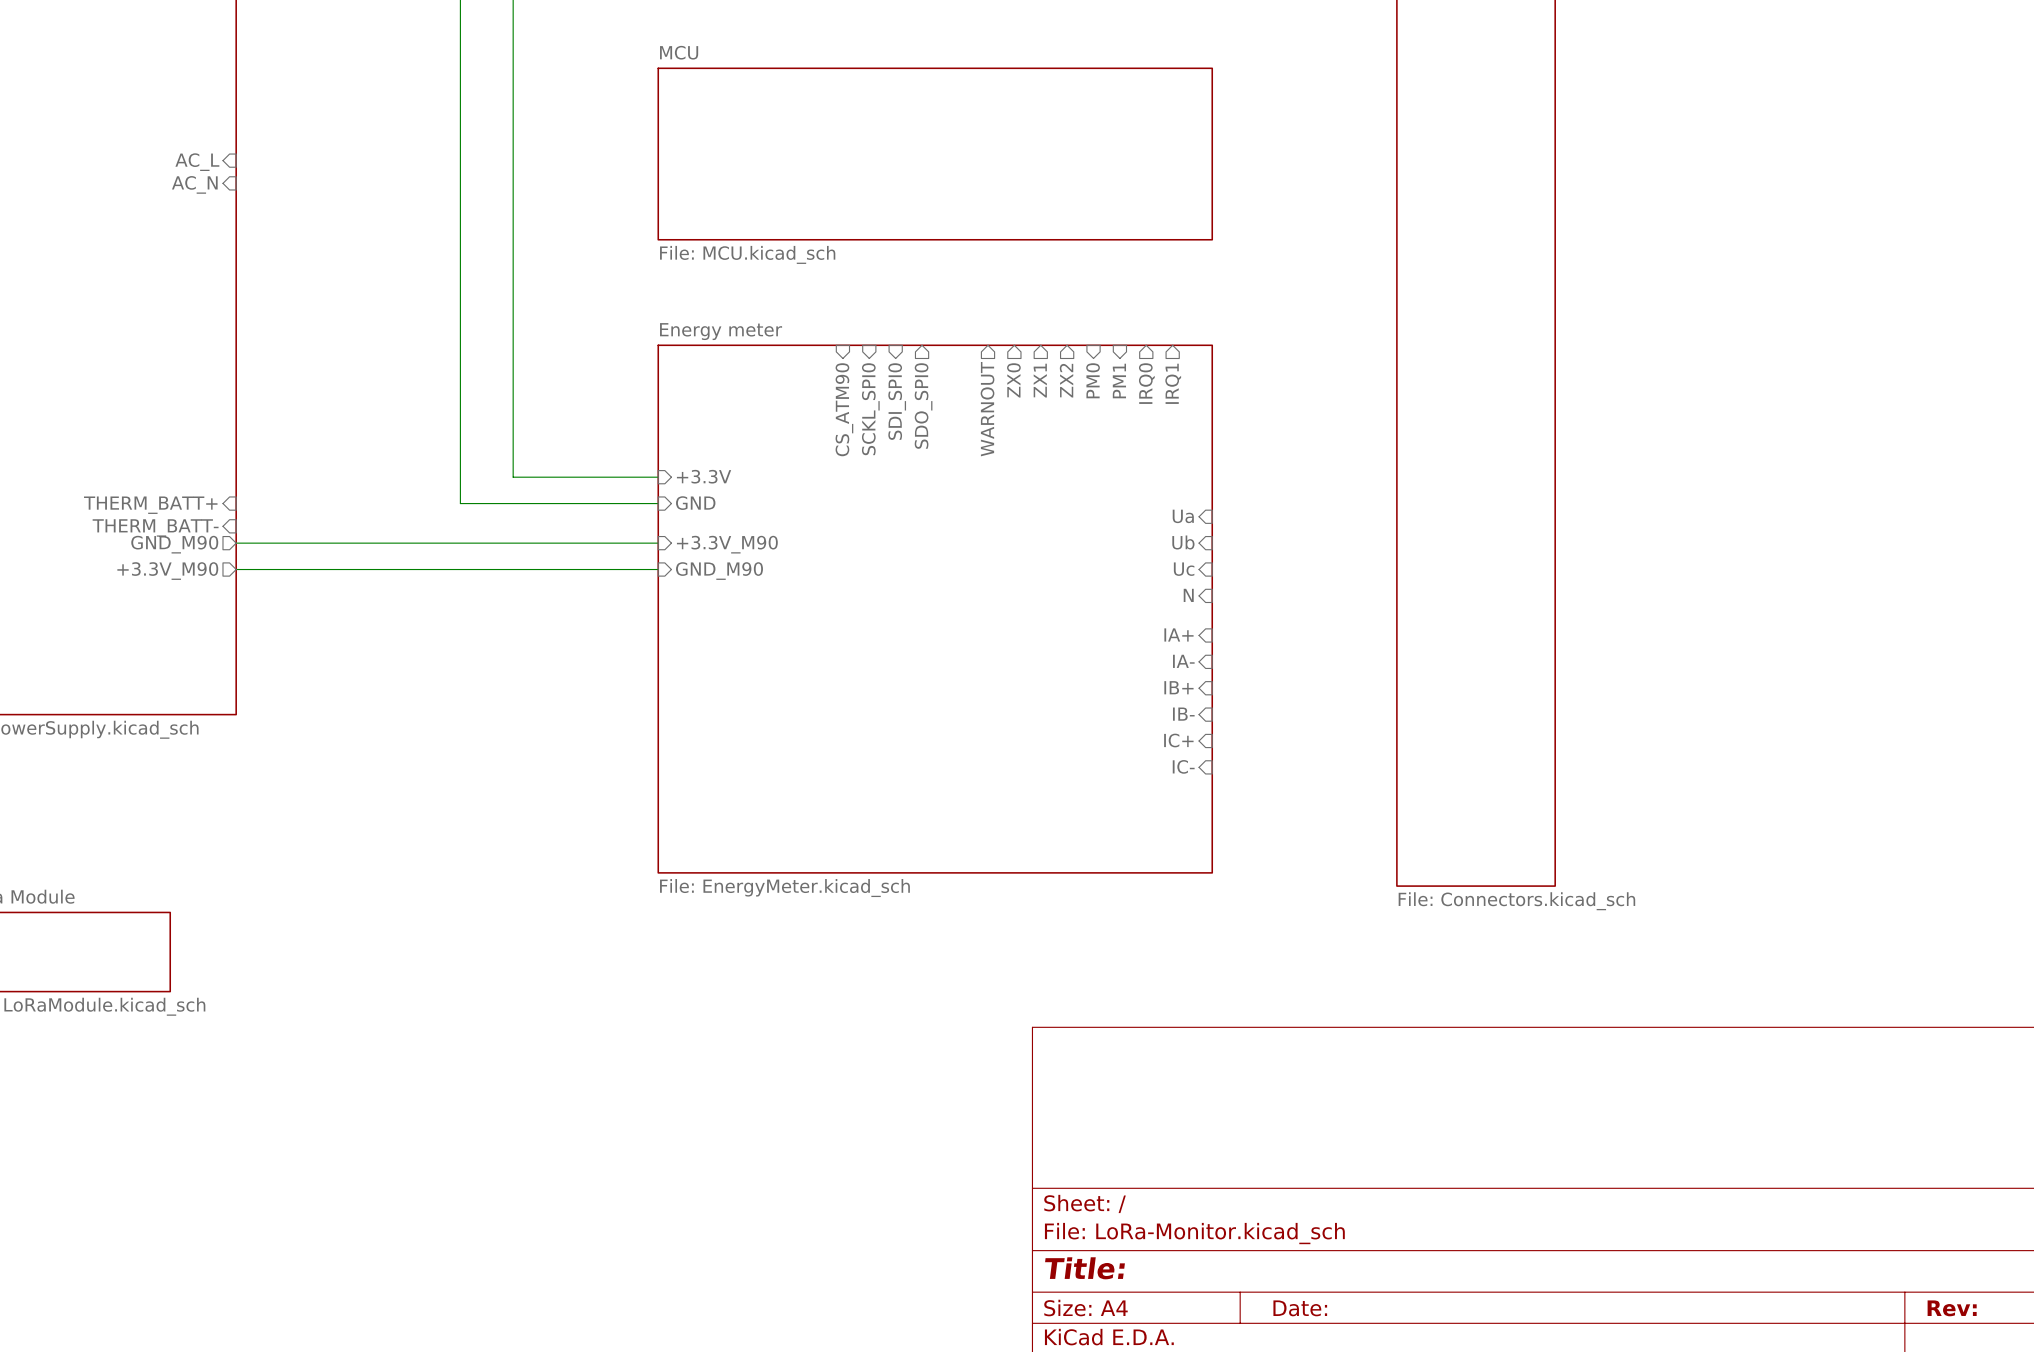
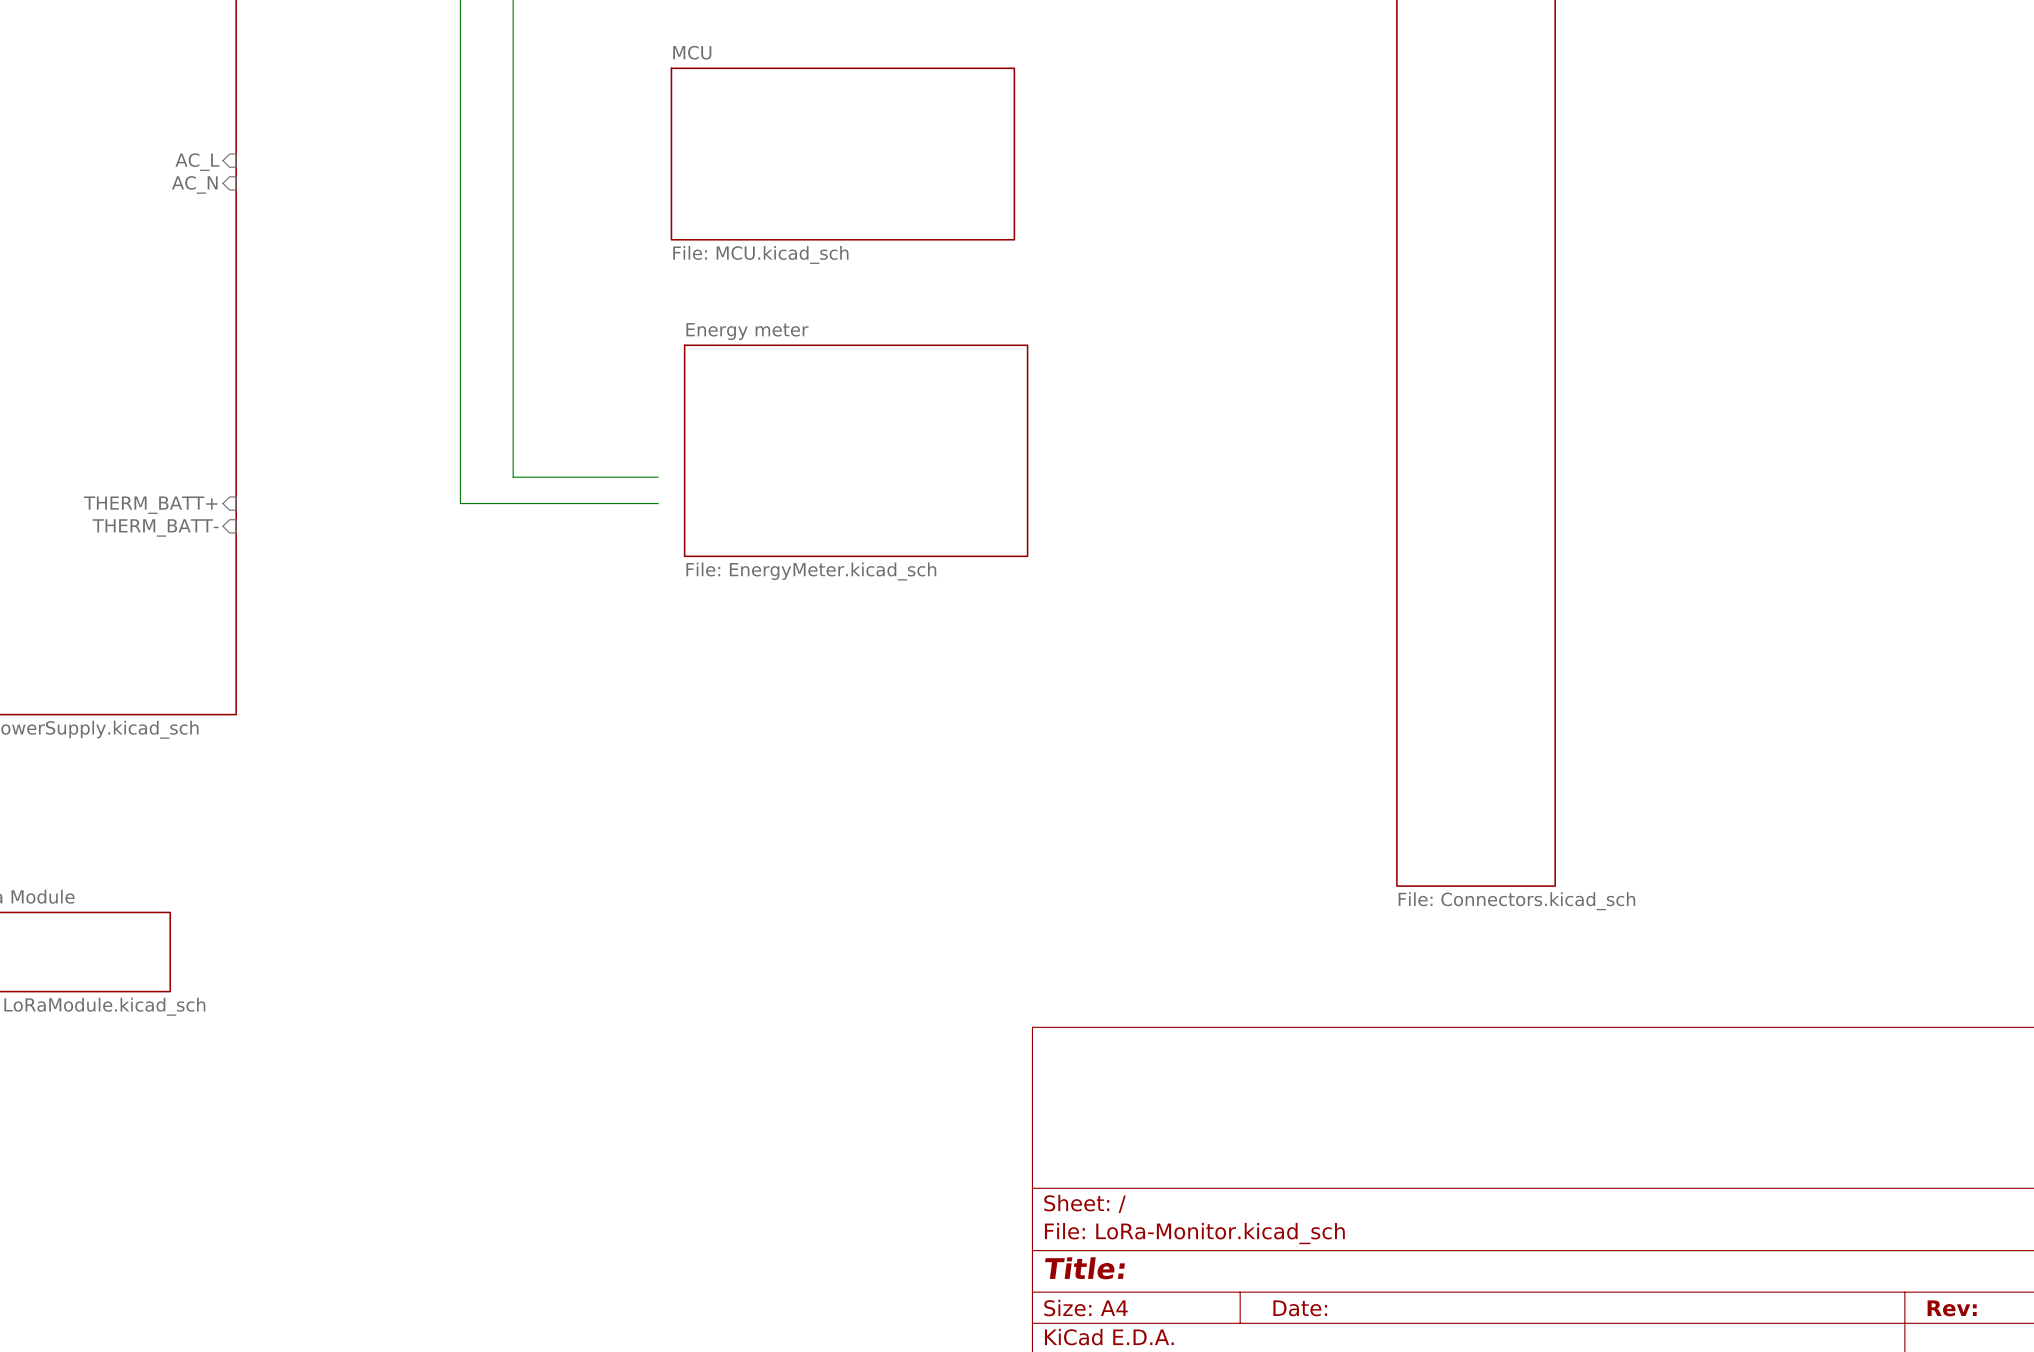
sheet MCU: none -> File: MCU.kicad_sch (842, 154)
sheet MCU: File: MCU.kicad_sch (935, 154) -> none
sheet pin: ZX0 (1013, 380) -> none
sheet pin: ZX1 (1040, 380) -> none
sheet pin: ZX2 (1066, 380) -> none
sheet pin: PM0 (1093, 380) -> none
sheet pin: PM1 (1119, 381) -> none
sheet pin: IRQ0 (1146, 383) -> none
sheet pin: IRQ1 (1173, 383) -> none
sheet pin: SDI_SPI0 (897, 401) -> none
sheet pin: SDO_SPI0 (923, 406) -> none
sheet pin: CS_ATM90 (844, 409) -> none
sheet pin: SCKL_SPI0 (870, 409) -> none
sheet pin: WARNOUT (987, 409) -> none
sheet Energy meter: none -> File: EnergyMeter.kicad_sch (856, 450)
sheet pin: +3.3V (704, 476) -> none
sheet pin: GND (695, 503) -> none
sheet pin: Ua (1183, 516) -> none
sheet pin: Ub (1183, 542) -> none
wire: (236, 543) (658, 543) -> none
sheet pin: GND_M90 (174, 544) -> none
sheet pin: +3.3V_M90 (727, 544) -> none
wire: (236, 569) (658, 569) -> none
sheet pin: Uc (1184, 569) -> none
sheet pin: +3.3V_M90 (167, 571) -> none
sheet pin: GND_M90 (719, 571) -> none
sheet pin: N (1188, 595) -> none
sheet Energy meter: File: EnergyMeter.kicad_sch (935, 609) -> none
sheet pin: IA+ (1178, 634) -> none
sheet pin: IA- (1183, 661) -> none
sheet pin: IB+ (1178, 687) -> none
sheet pin: IB- (1183, 714) -> none
sheet pin: IC+ (1178, 740) -> none
sheet pin: IC- (1183, 766) -> none

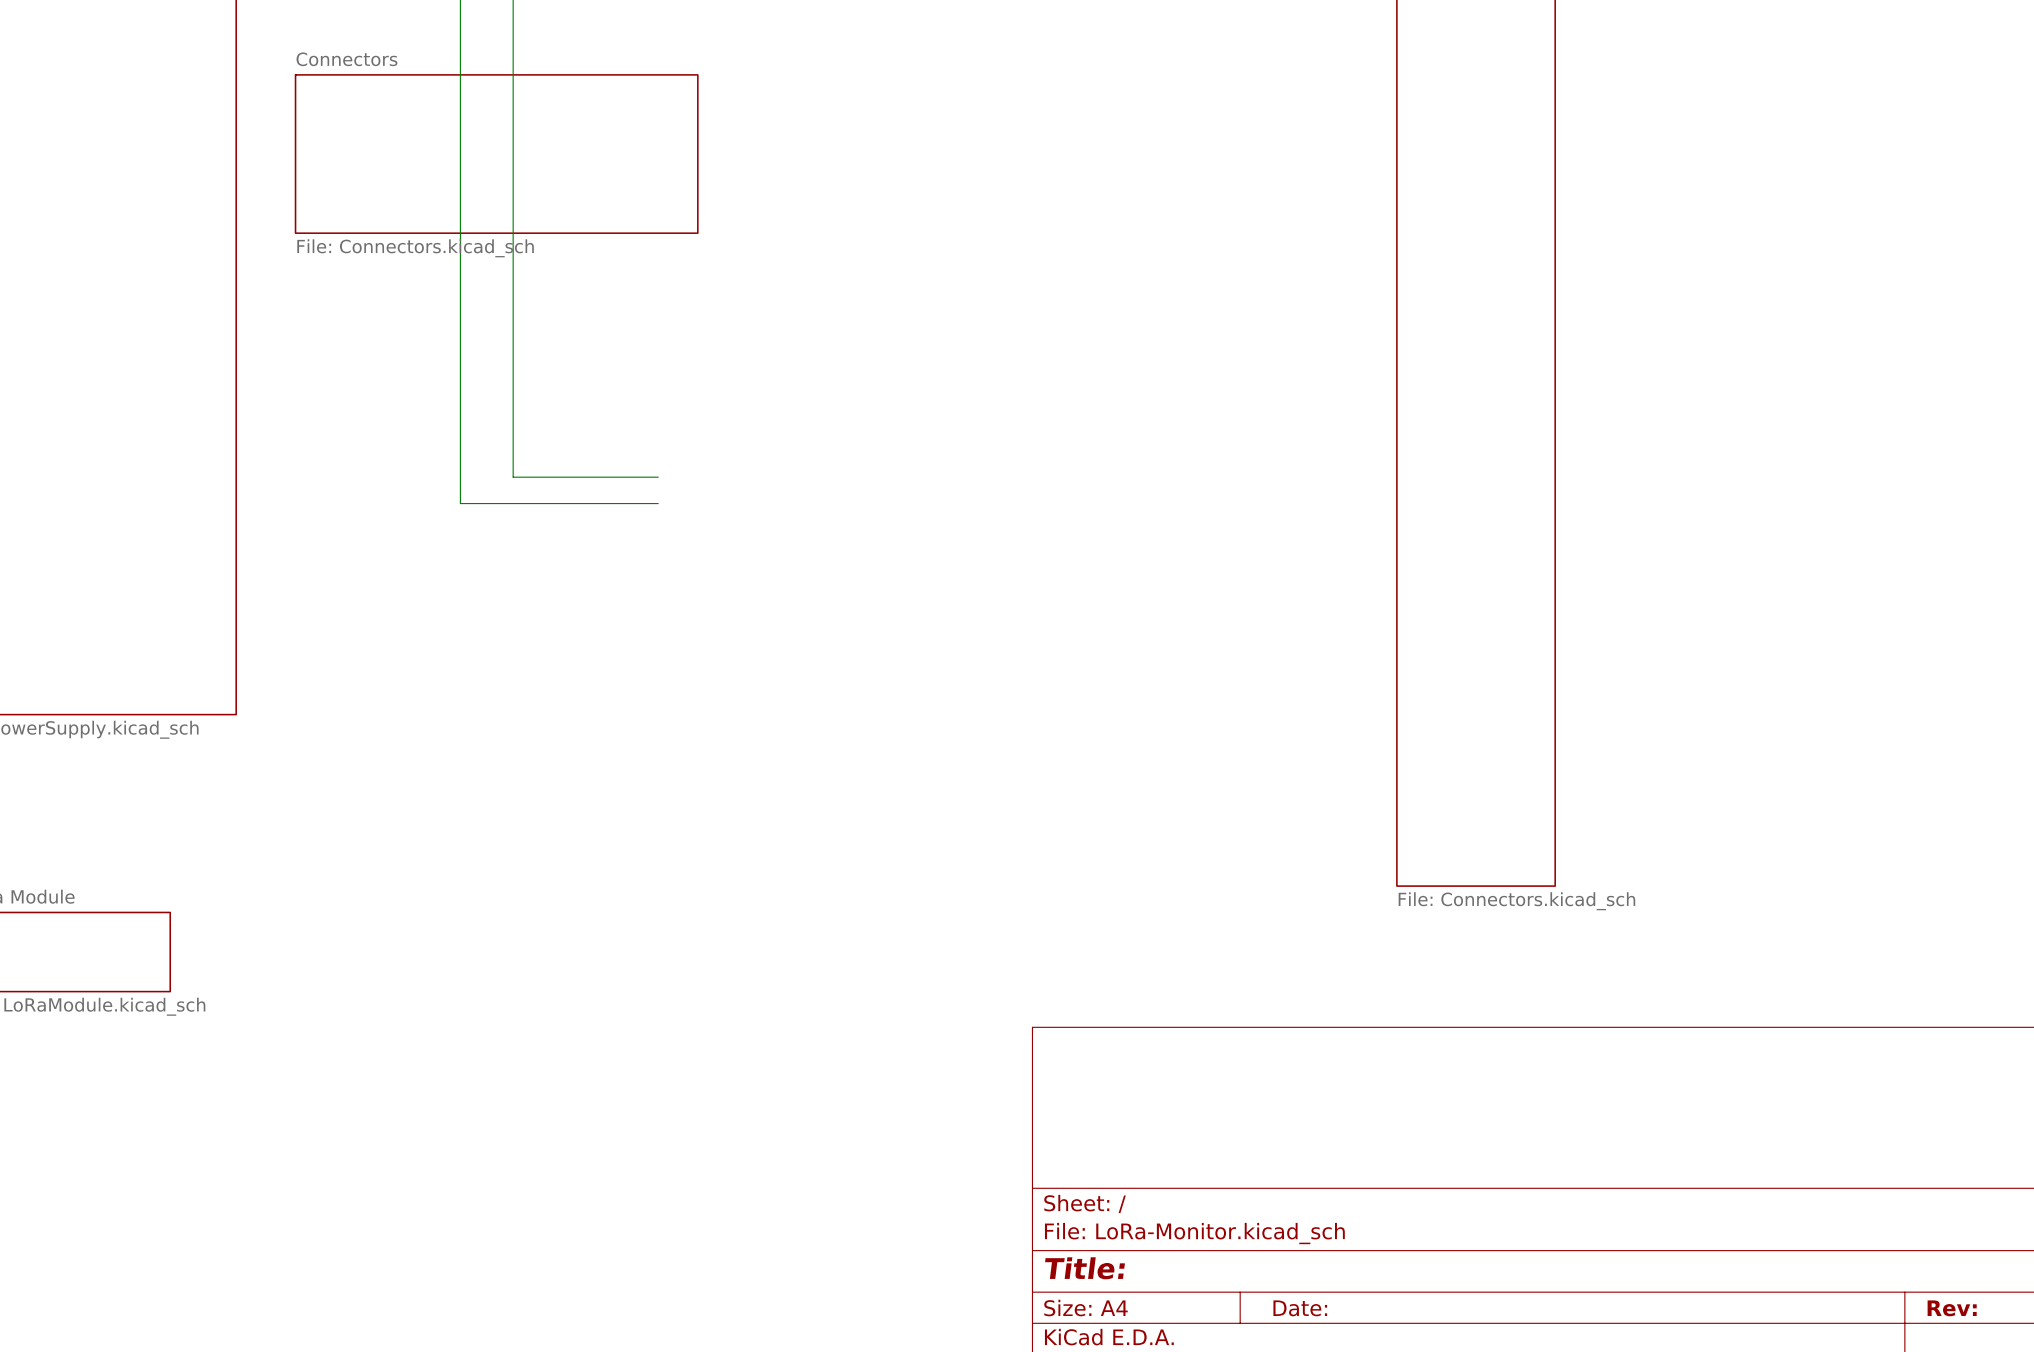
sheet Connectors: none -> File: Connectors.kicad_sch (496, 154)
sheet MCU: File: MCU.kicad_sch (842, 154) -> none
sheet pin: AC_L (197, 162) -> none
sheet pin: AC_N (194, 184) -> none
sheet Energy meter: File: EnergyMeter.kicad_sch (856, 450) -> none
sheet pin: THERM_BATT+ (150, 505) -> none
sheet pin: THERM_BATT- (155, 527) -> none

